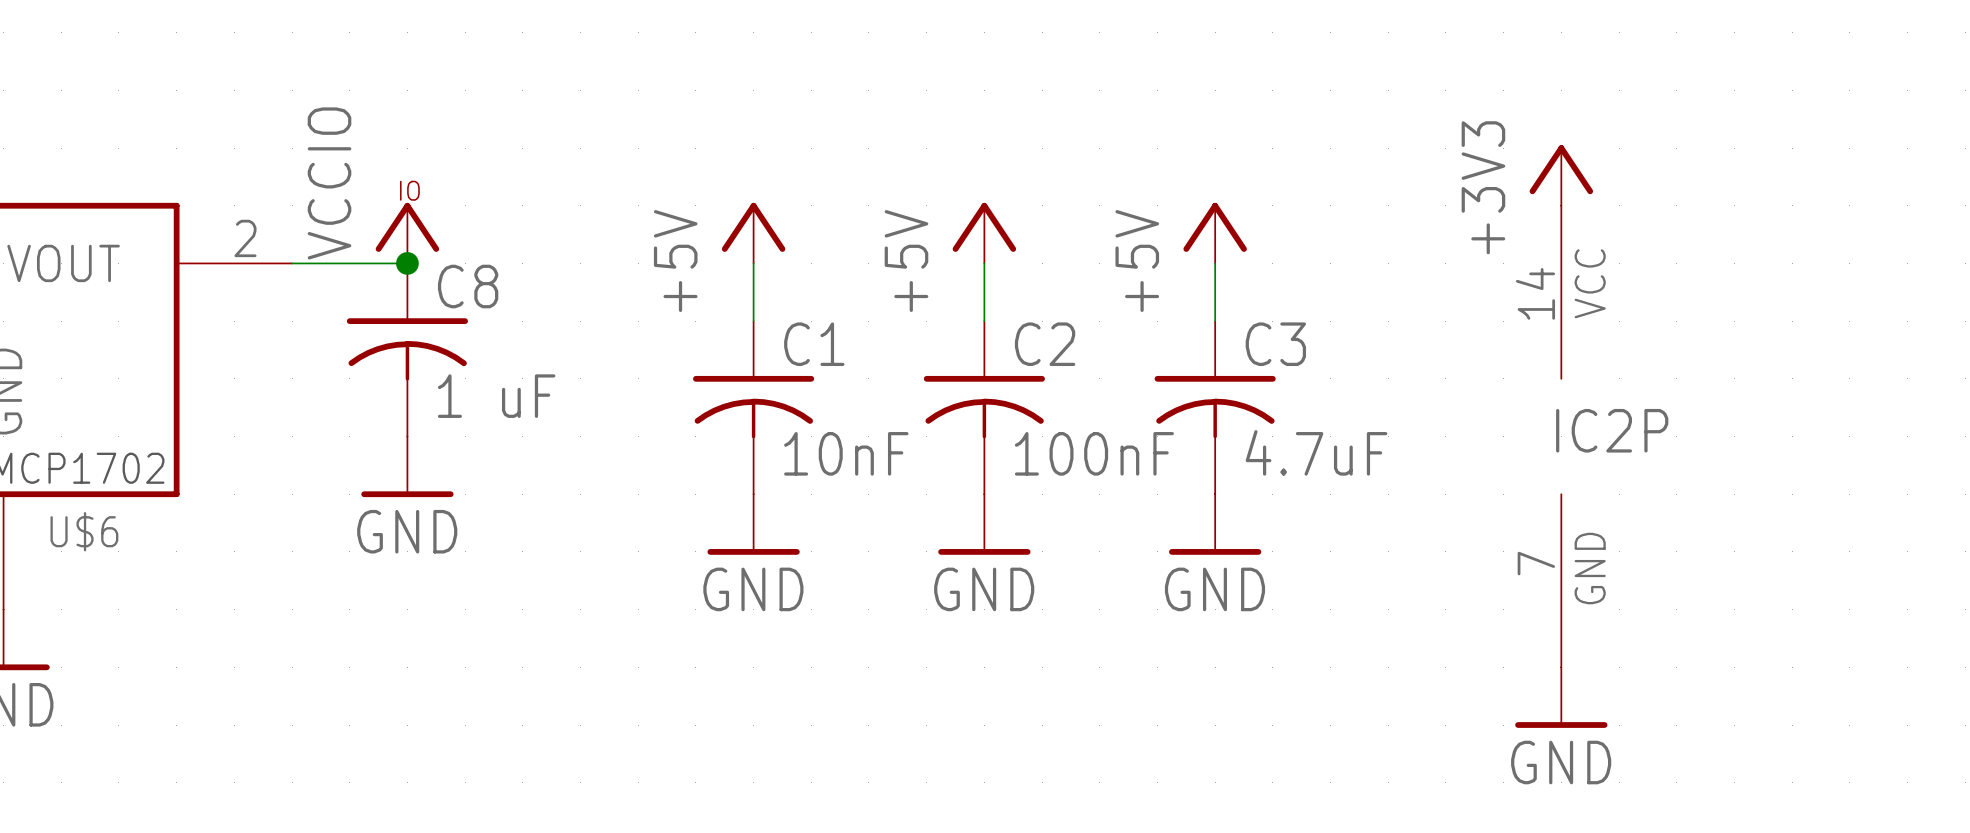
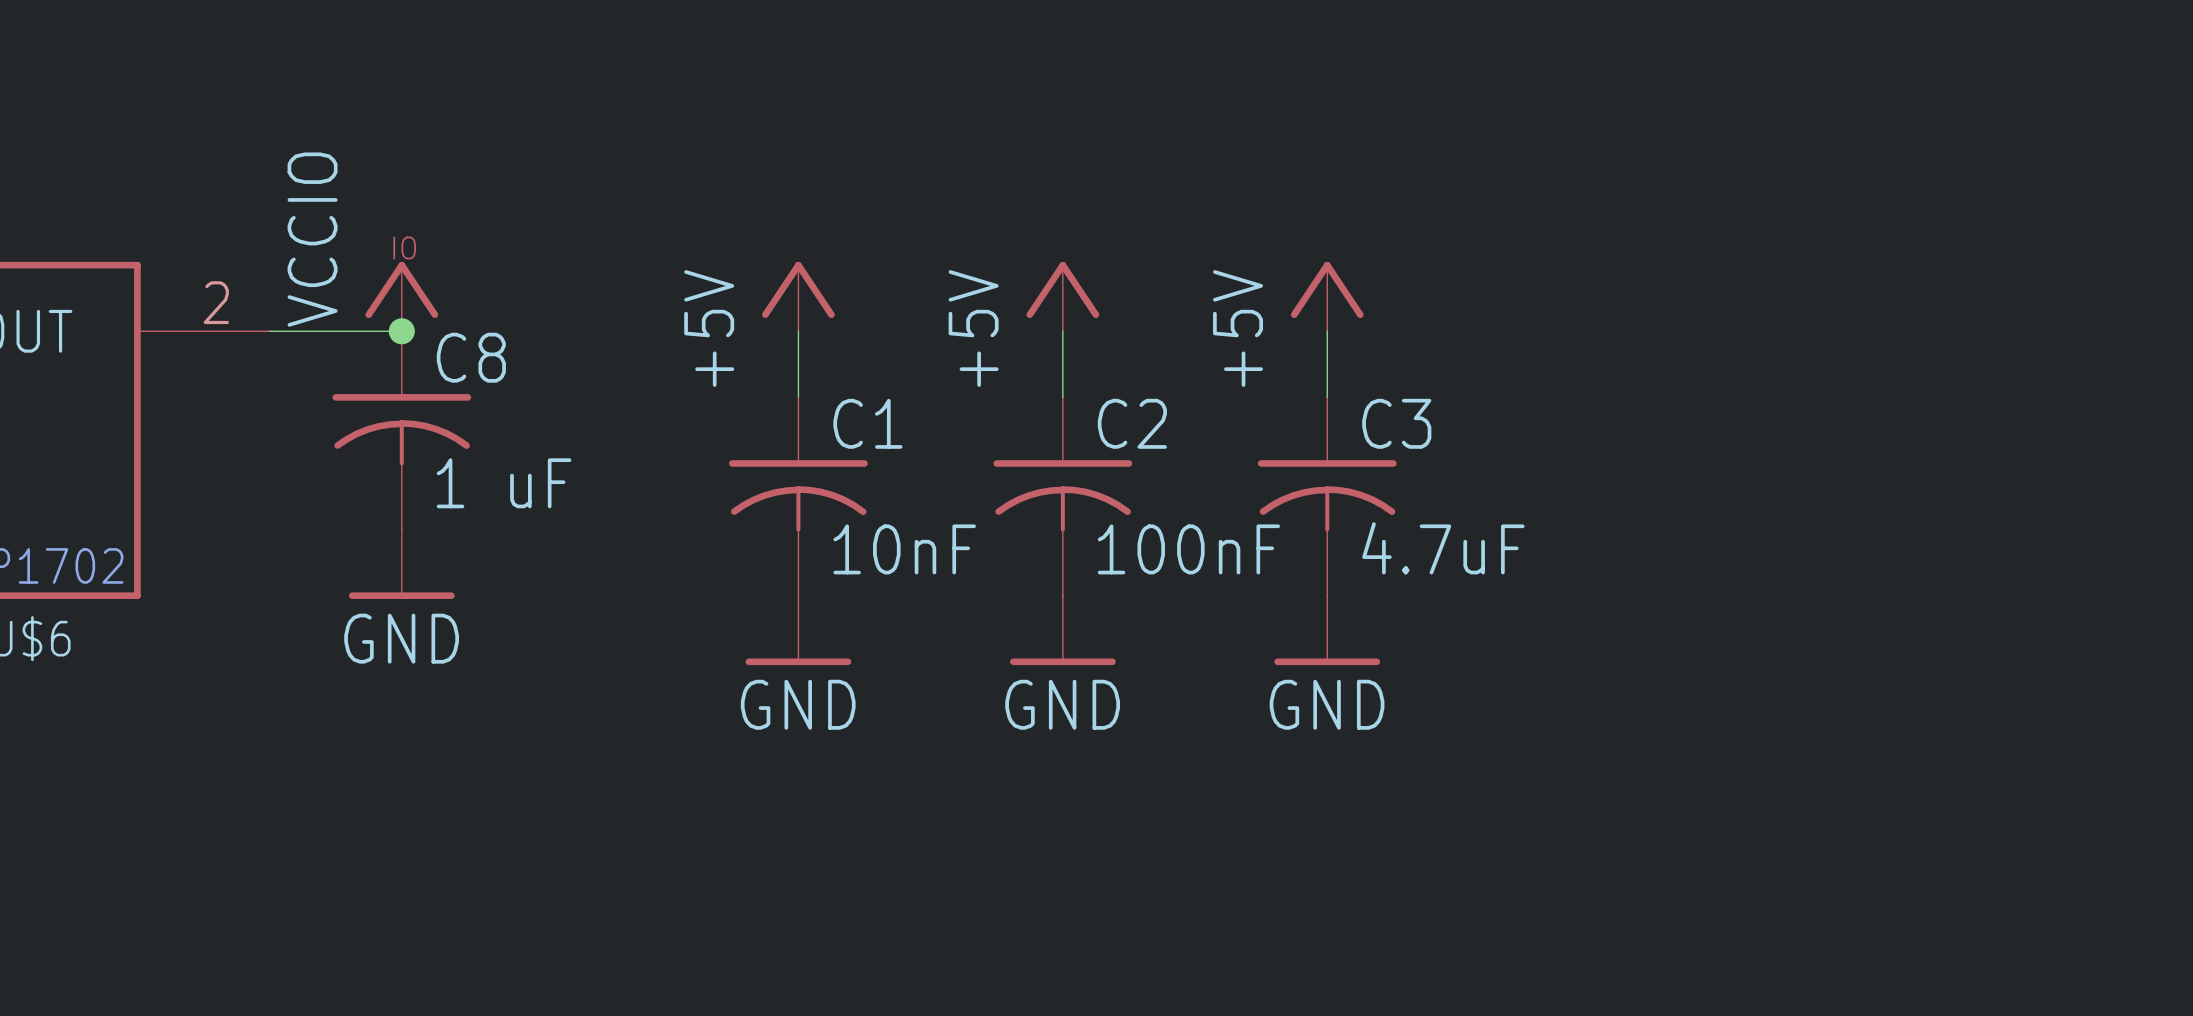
power symbol: +3V3 (1561, 175) -> none
IC2P: (1561, 436) -> none
power symbol: GND (1561, 697) -> none

